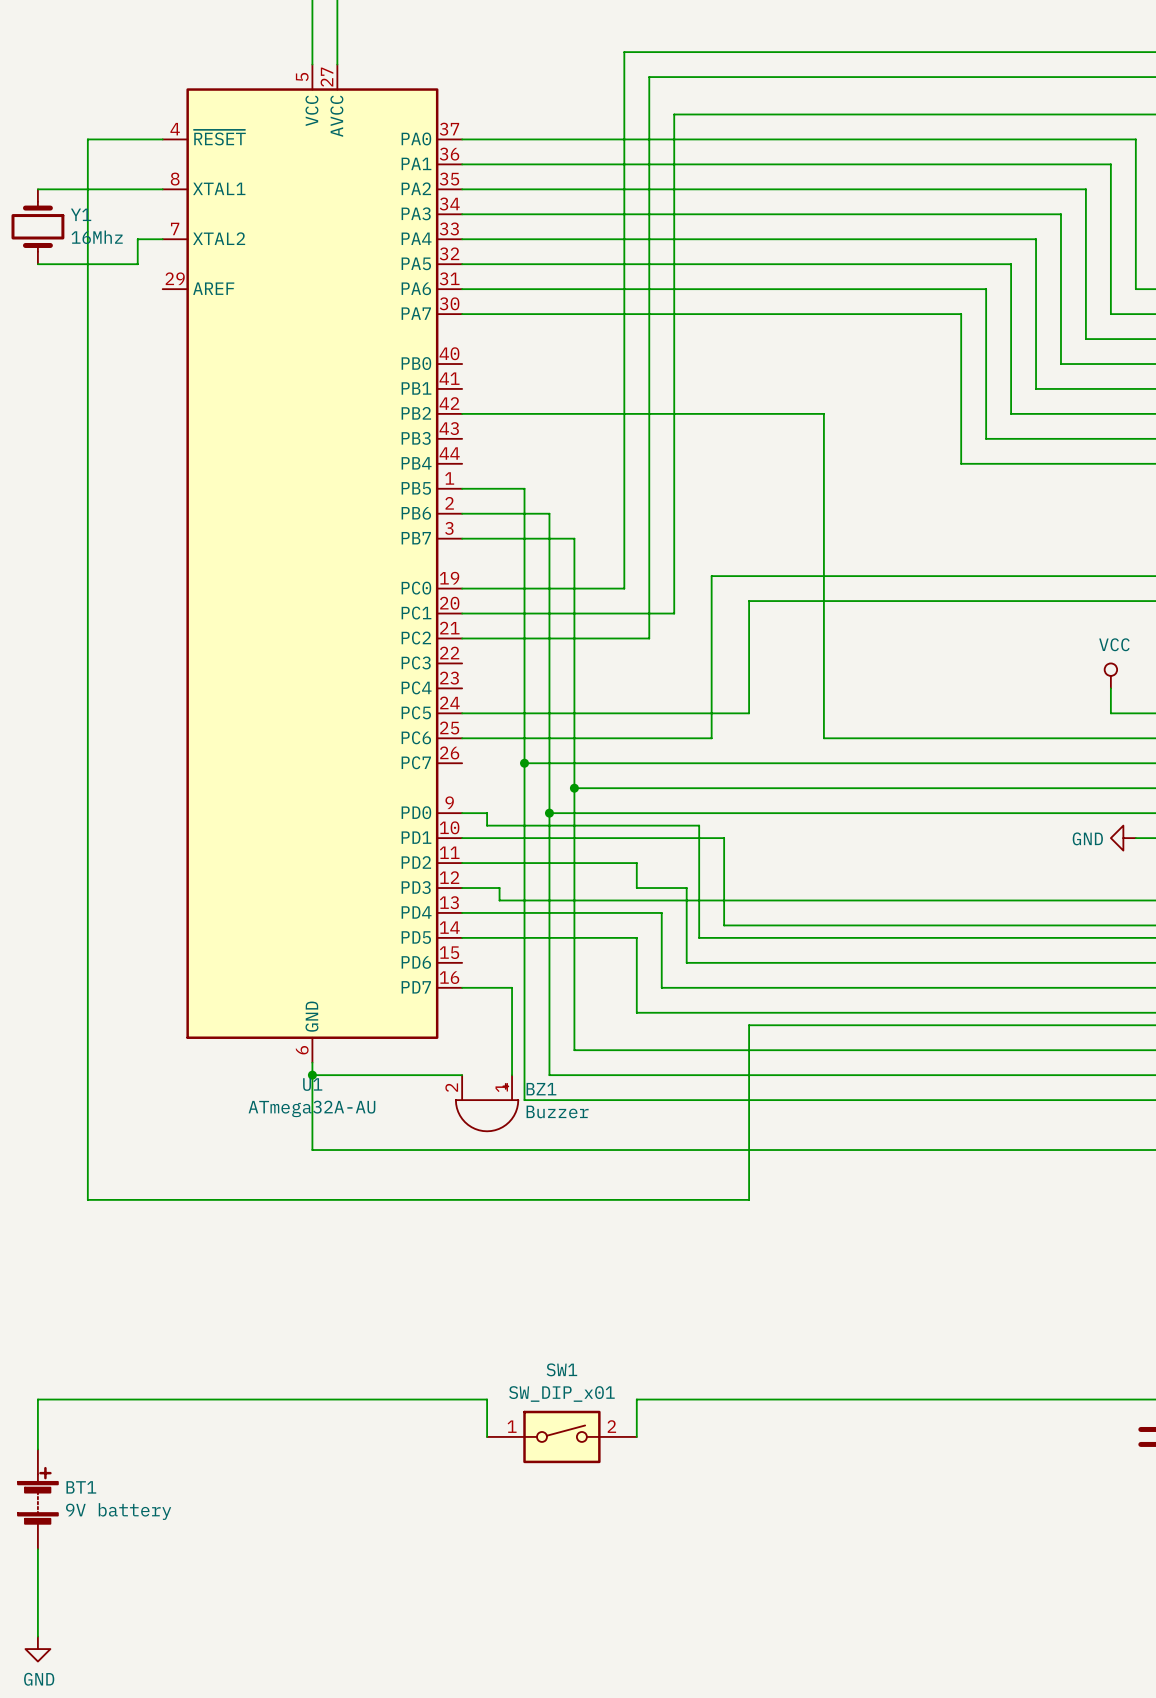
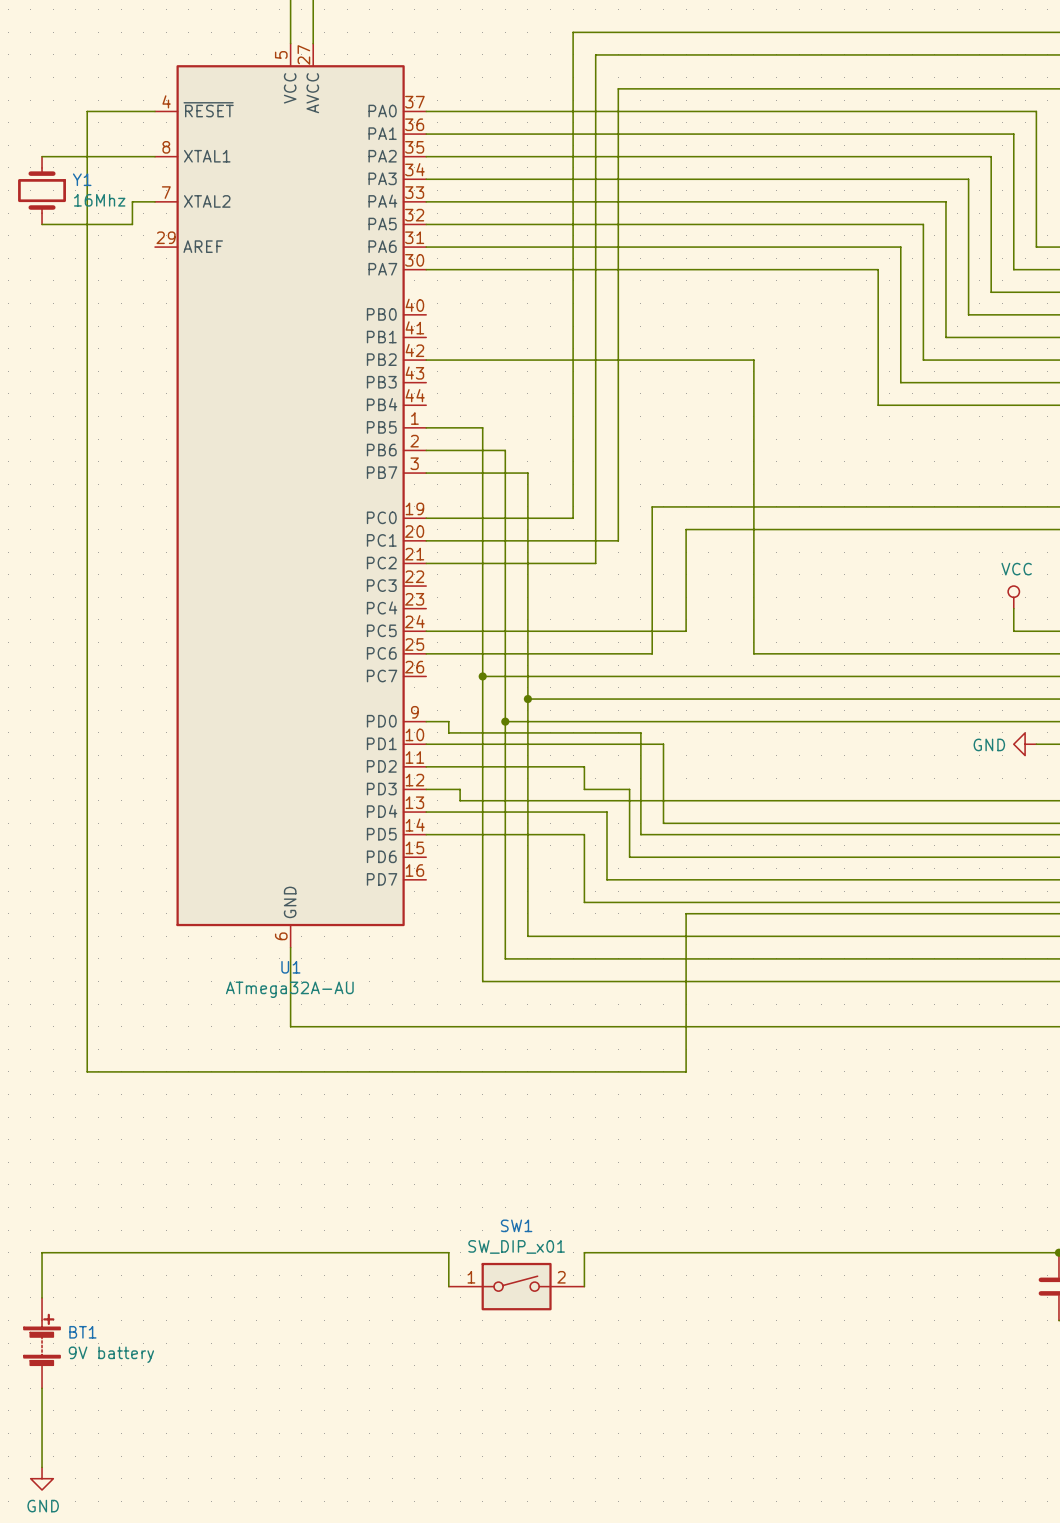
wire: (462, 987) (512, 987) (512, 1075) -> none
wire: (312, 1075) (462, 1075) -> none
junction: (312, 1075) -> none
BZ1: Buzzer (487, 1103) -> none

